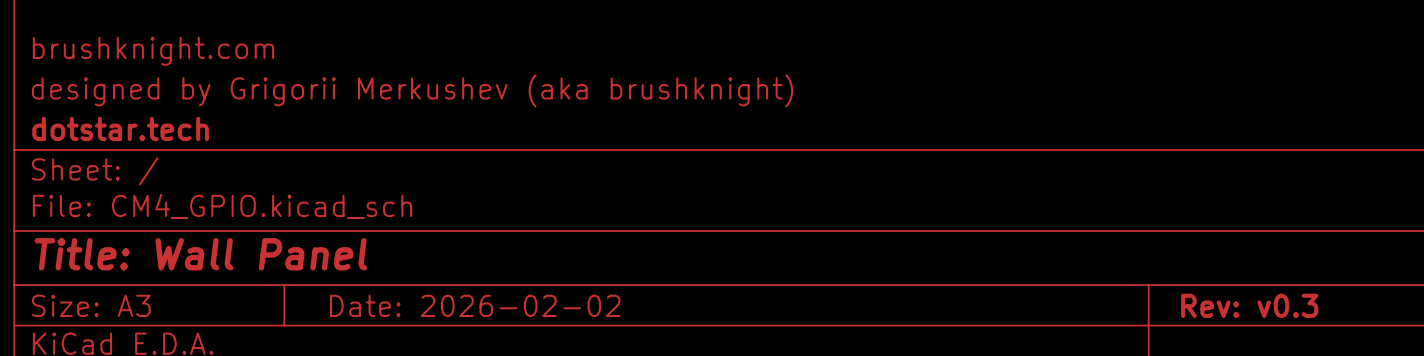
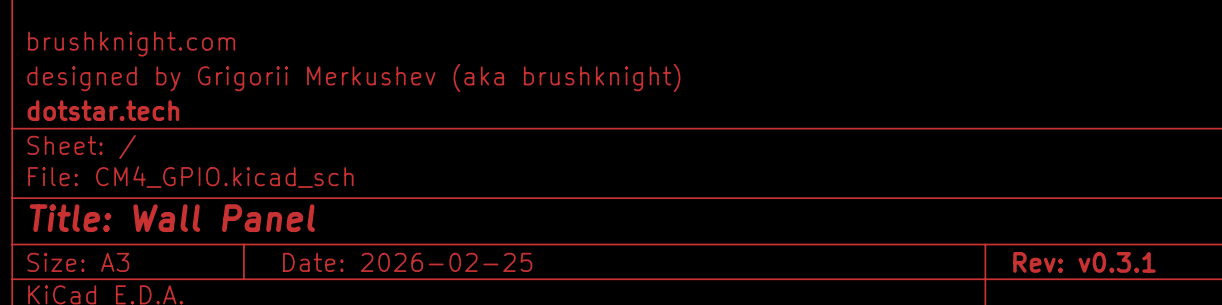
title block: Date: 2026-02-02 (475, 305) -> Date: 2026-02-25 (407, 262)
title block: Rev: v0.3 (1249, 305) -> Rev: v0.3.1 (1084, 262)

